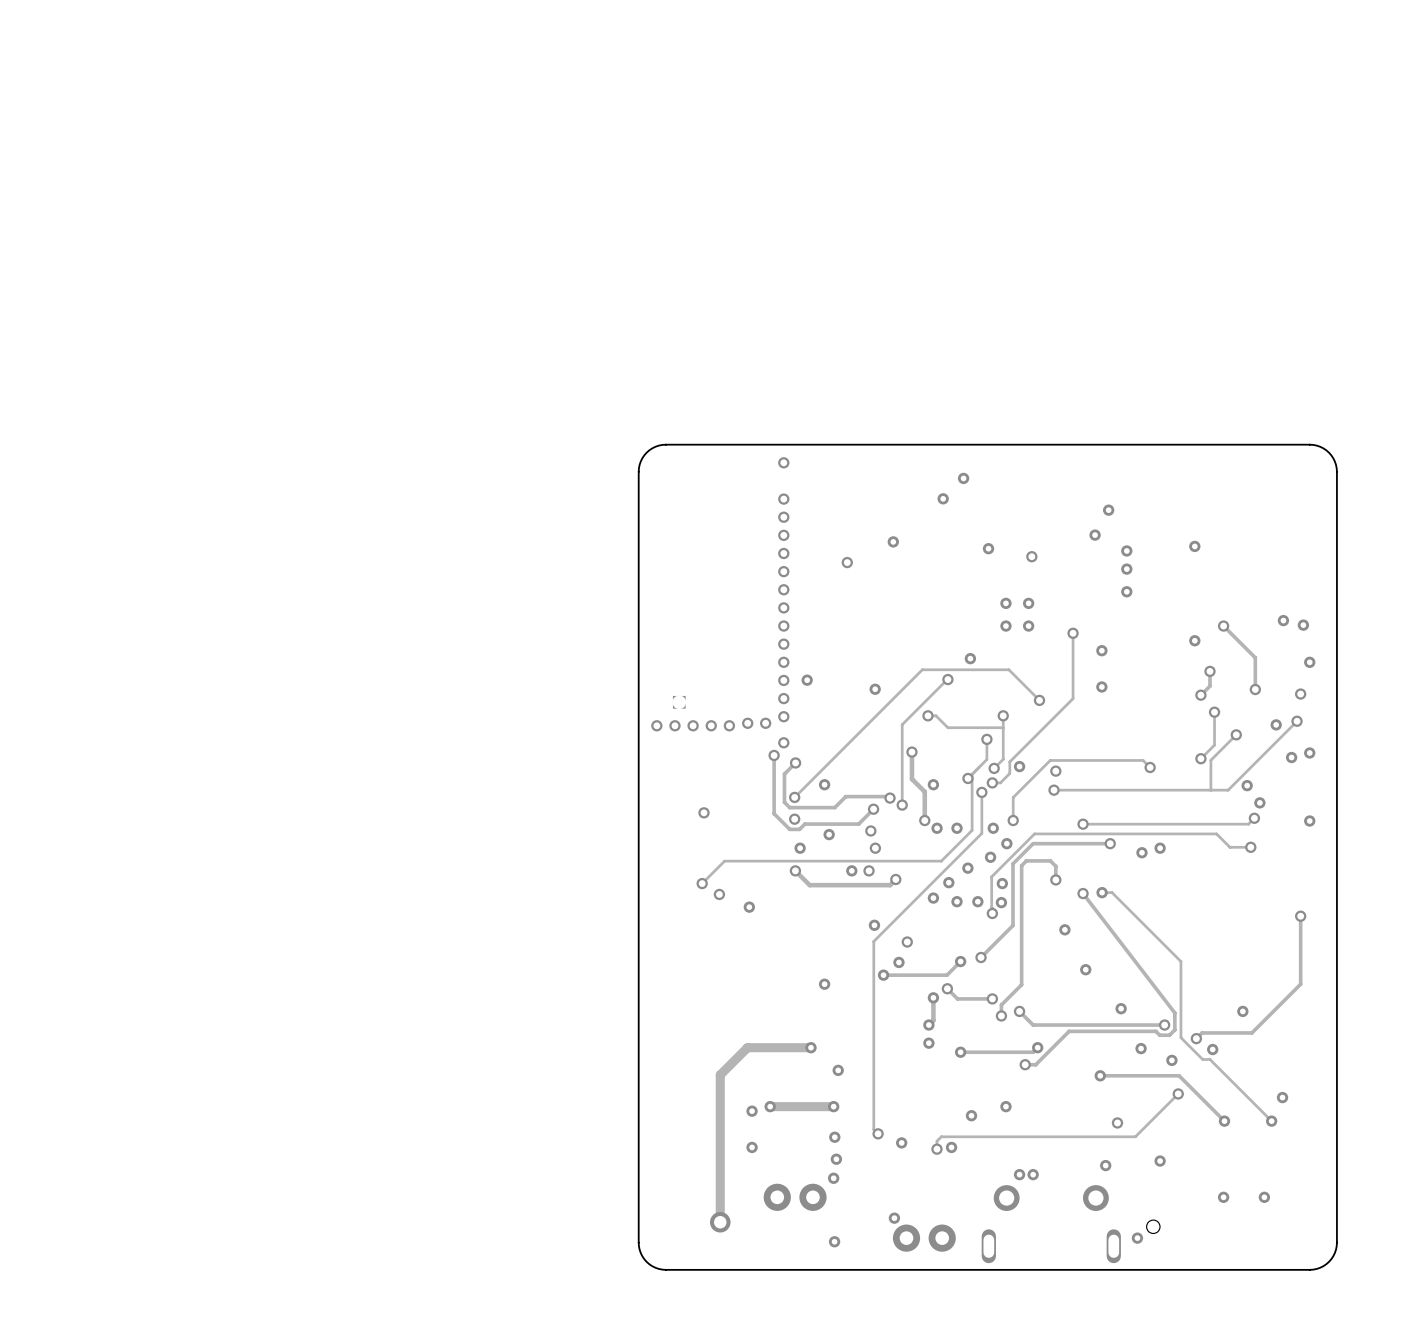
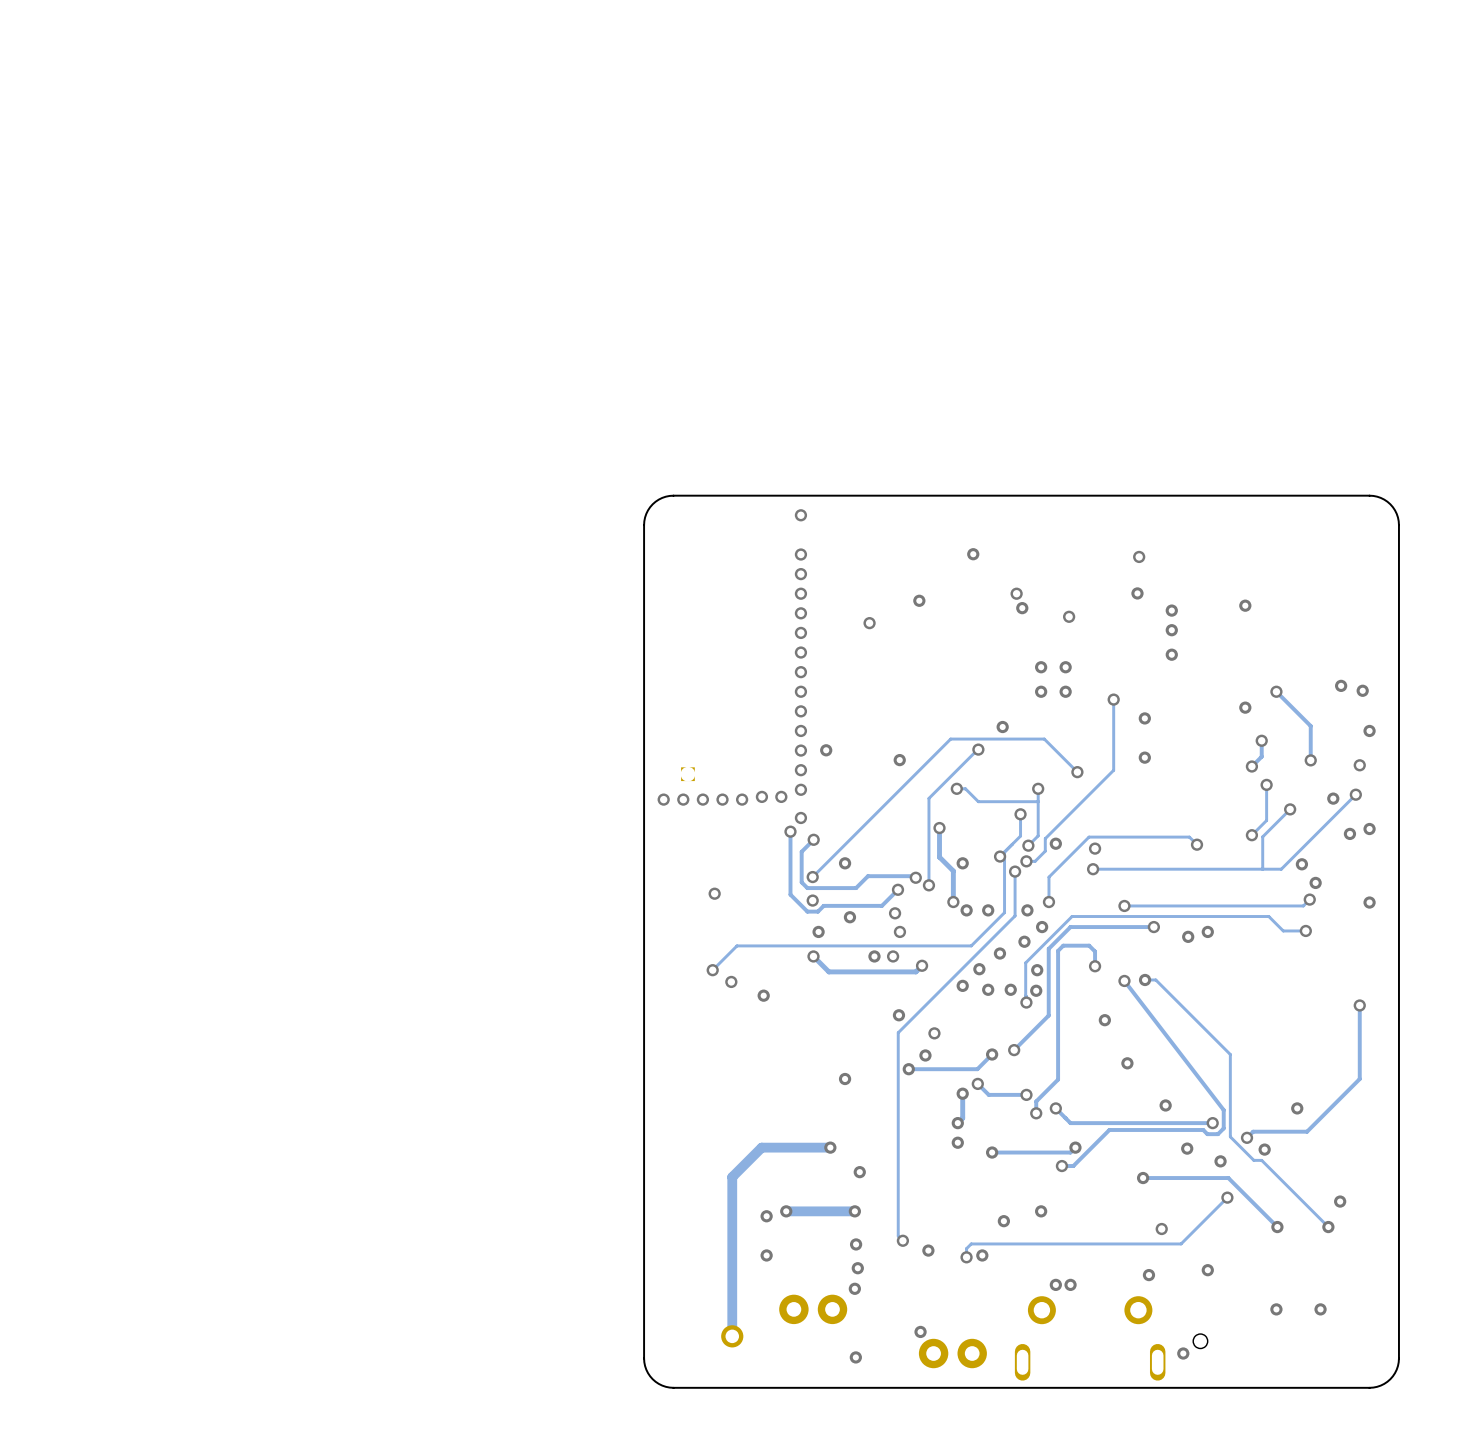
via: (963, 478) -> none
via: none -> (1139, 556)
via: (1108, 510) -> none
via: none -> (1016, 593)

